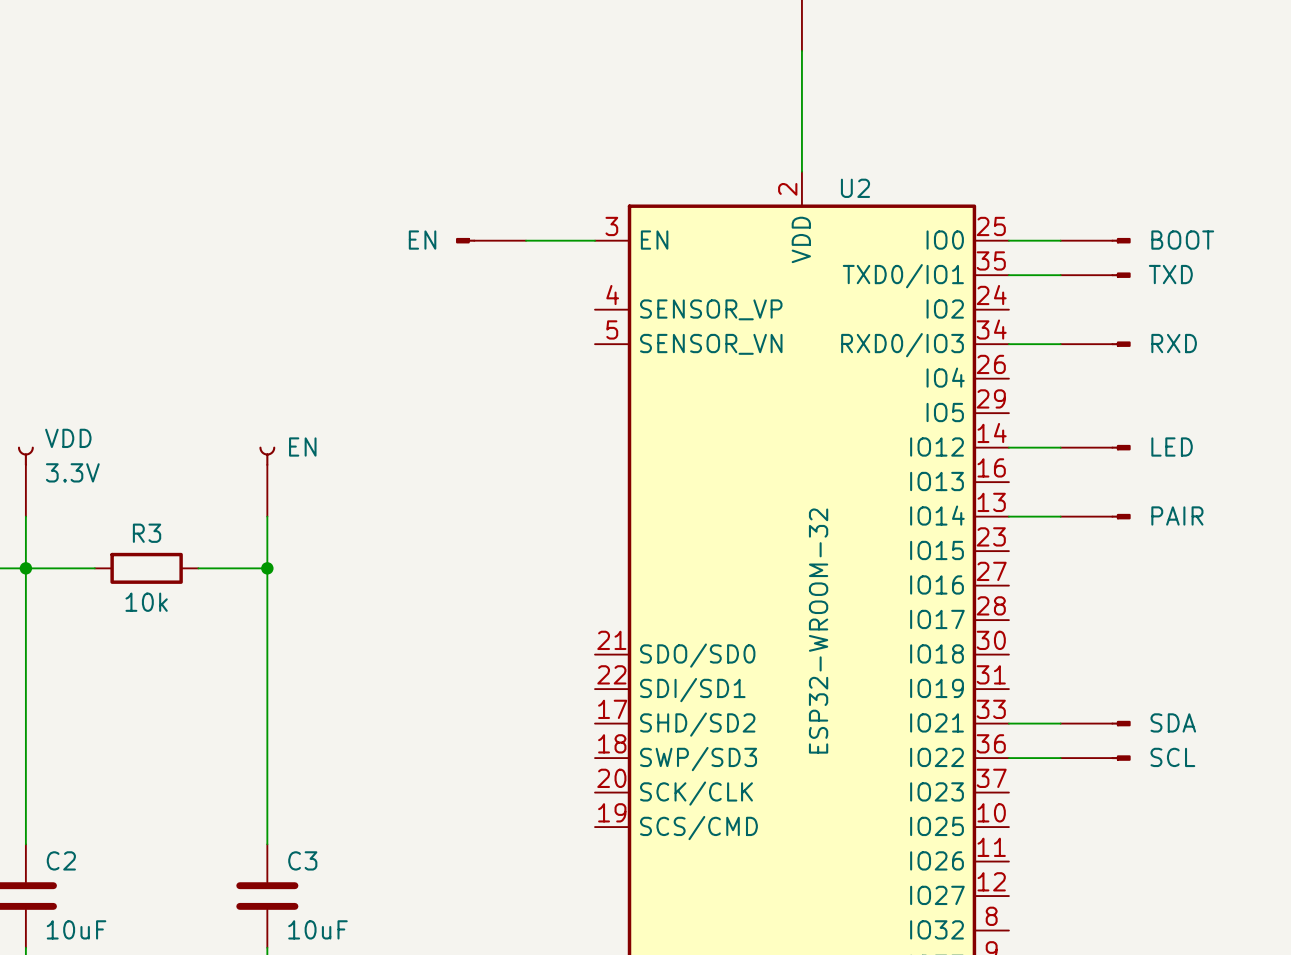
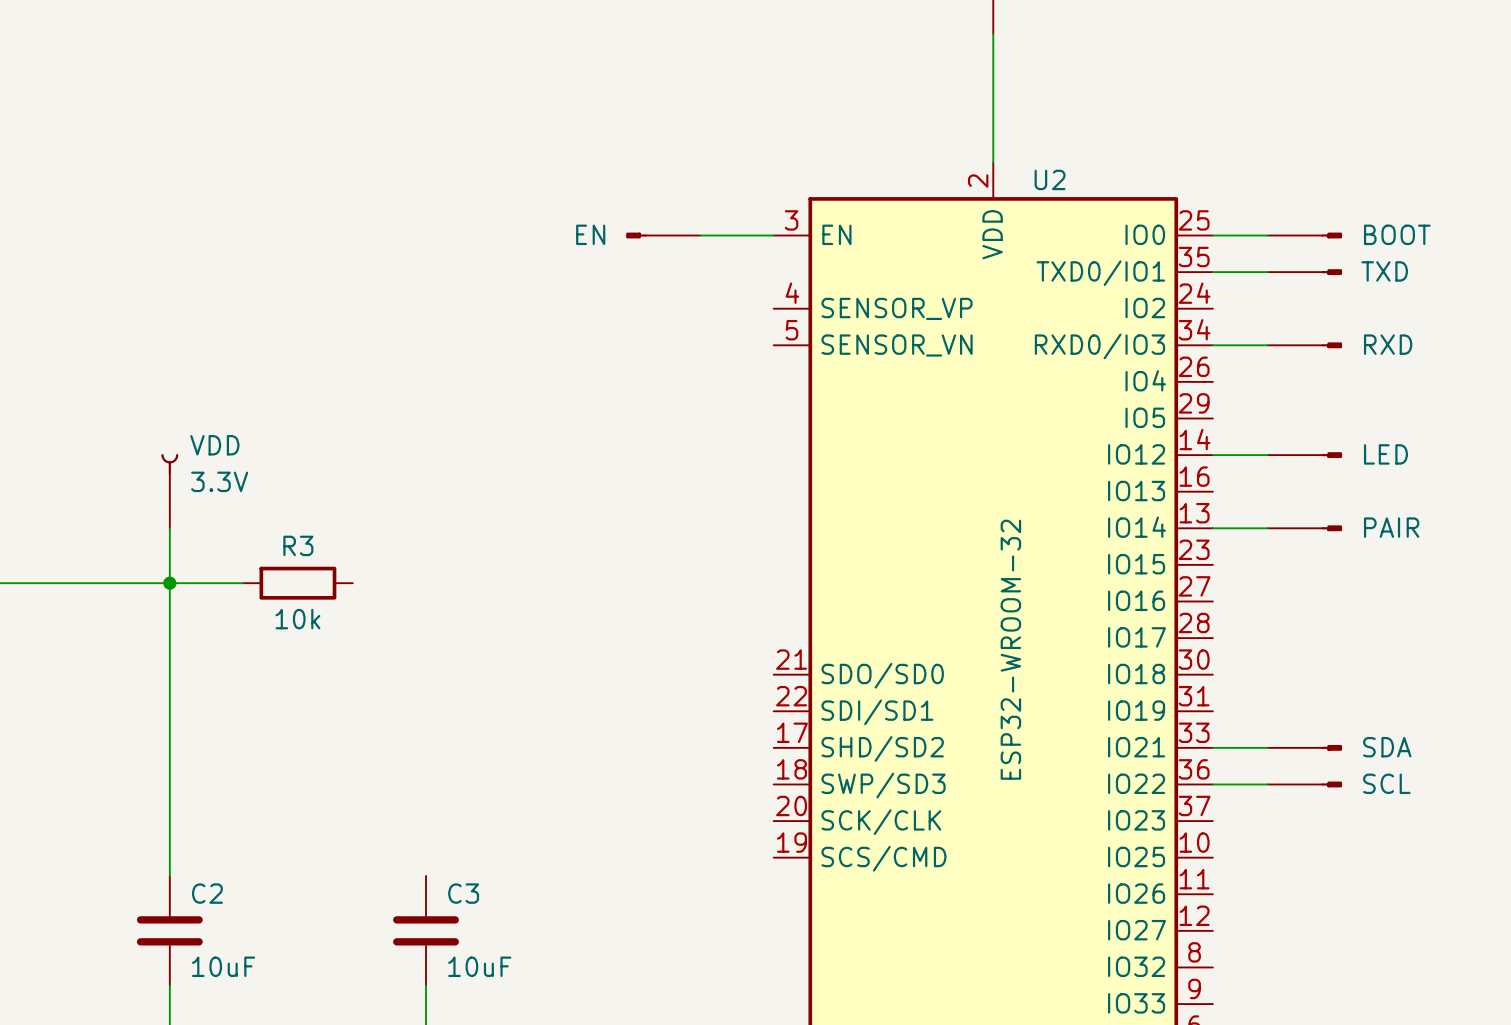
EN: (267, 481) -> none
wire: (267, 516) (267, 844) -> none
wire: (198, 568) (267, 568) -> none
junction: (267, 568) -> none

